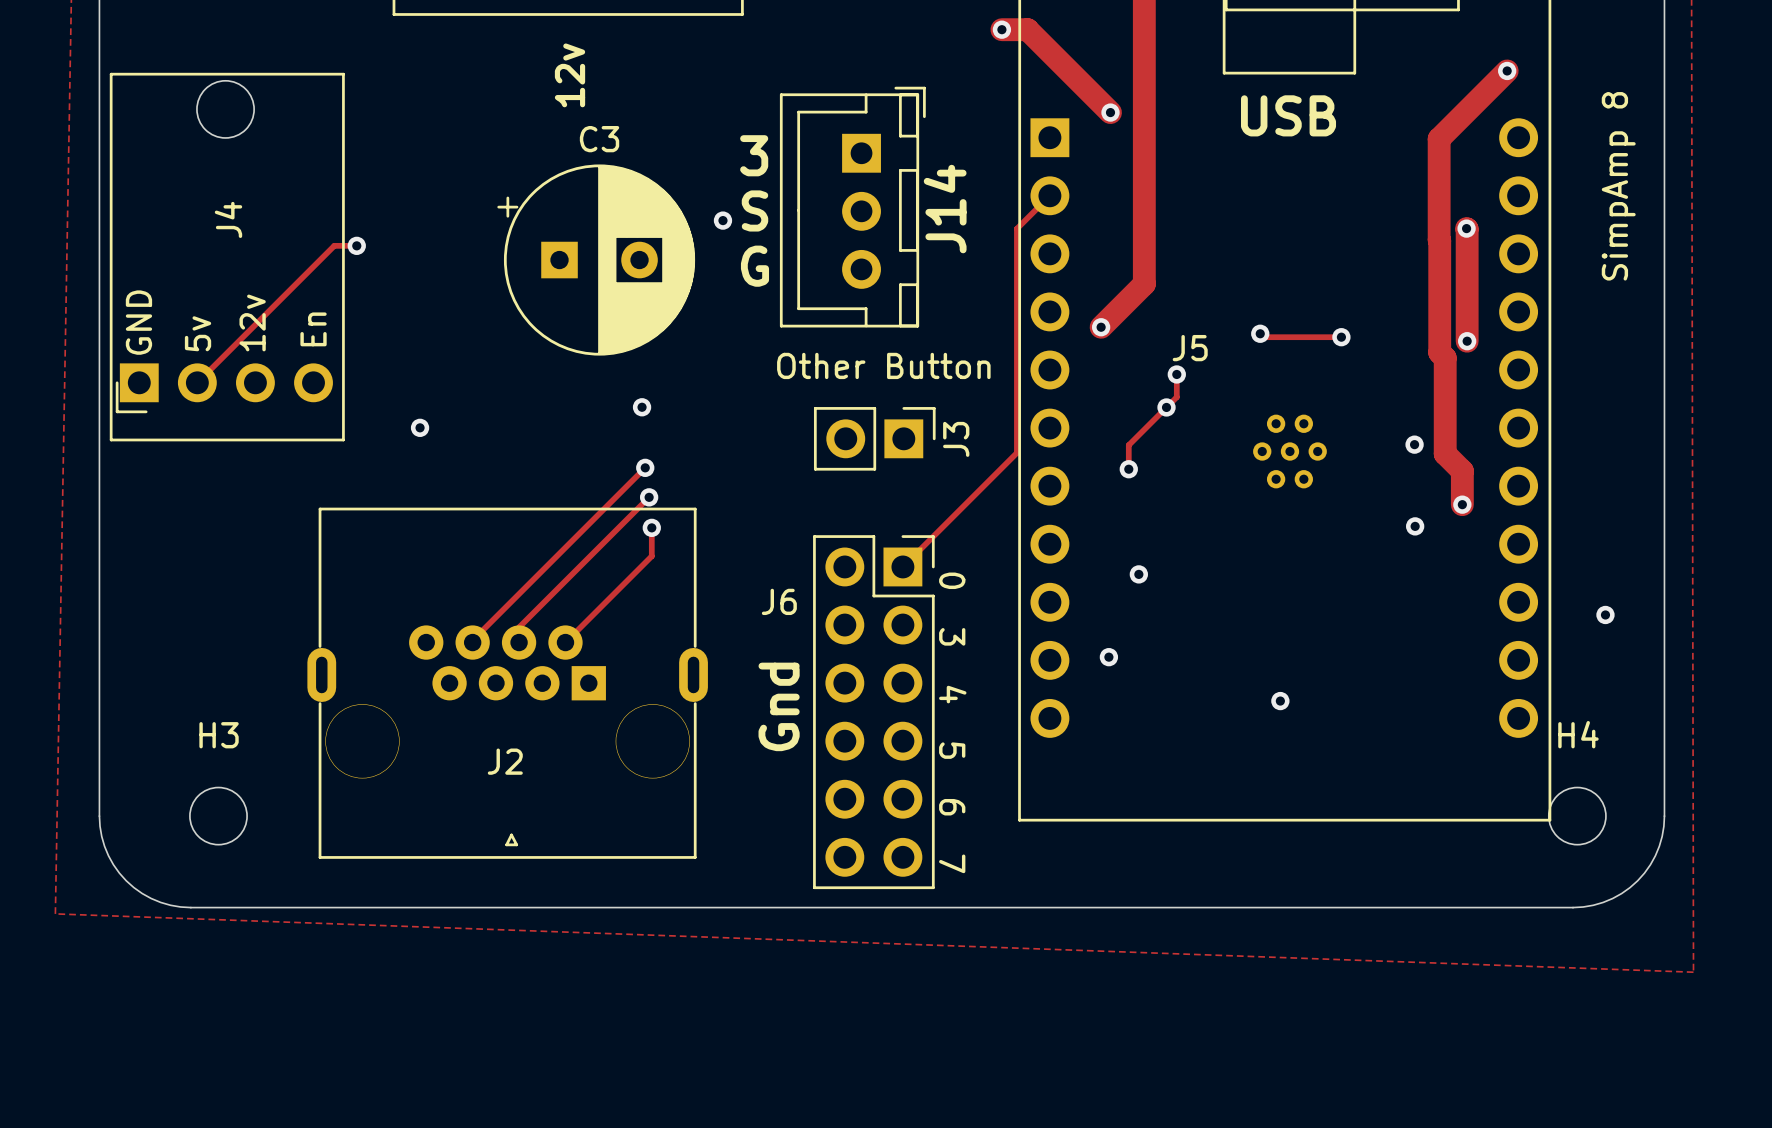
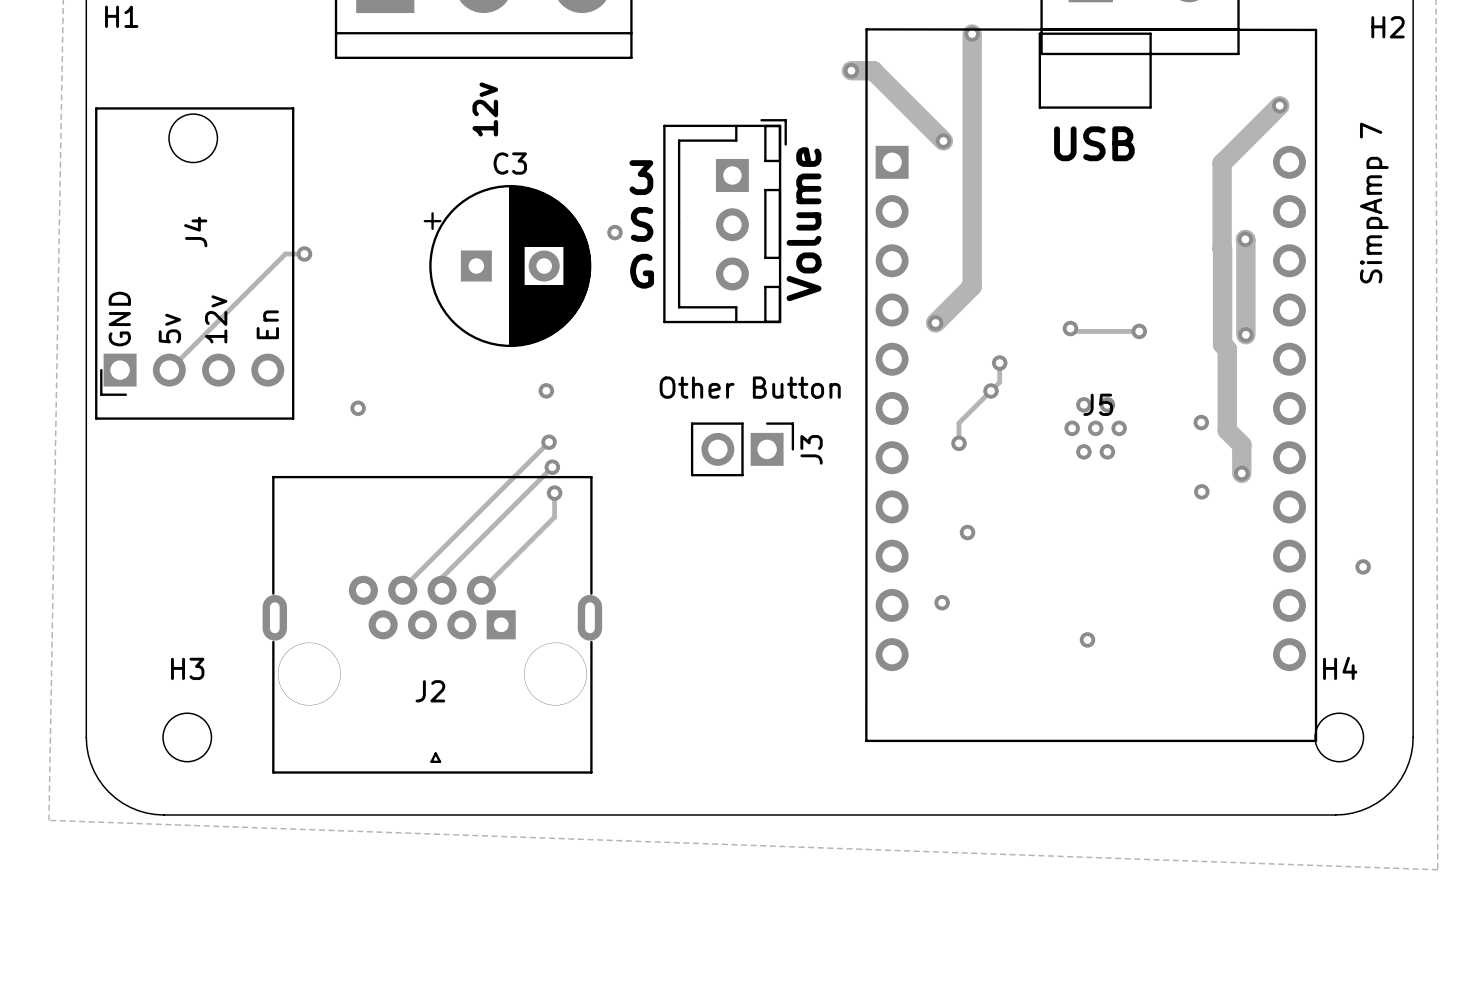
text: SimpAmp 8 (1618, 186) -> SimpAmp 7 (1374, 203)
track: (1049, 195) (1016, 228) (1016, 452) (902, 566) -> none
J14 name: J14 (945, 209) -> Volume (804, 224)
J5 name position: J5 (1190, 348) -> J5 (1098, 404)
J3 position: (874, 438) -> (742, 449)
text: Gnd (779, 706) -> none
J6: (873, 712) -> none
text: 0 3 4 5 6 7 (952, 722) -> none

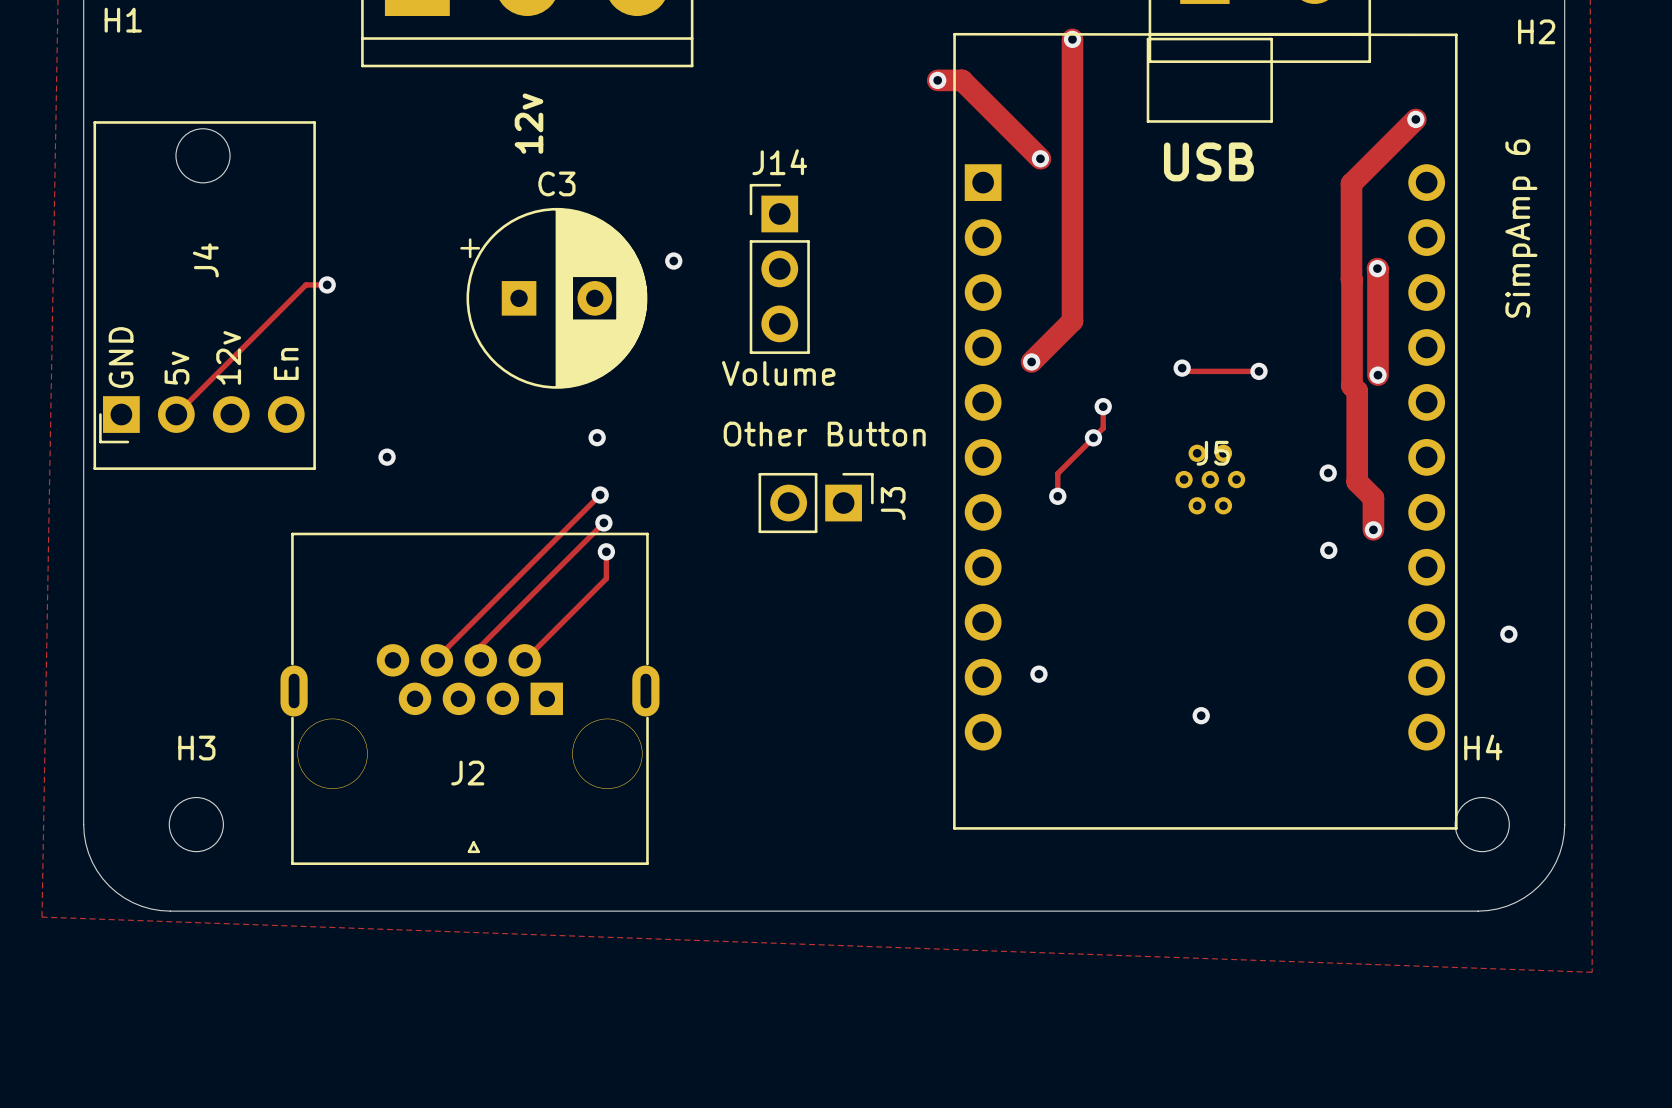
text: 3 (641, 177) -> none
text: SimpAmp 7 (1374, 203) -> SimpAmp 6 (1521, 228)
Volume: (725, 221) -> none
text: S (642, 224) -> none
J14: none -> Volume (779, 268)
text: G (642, 271) -> none
via: (967, 532) -> none

